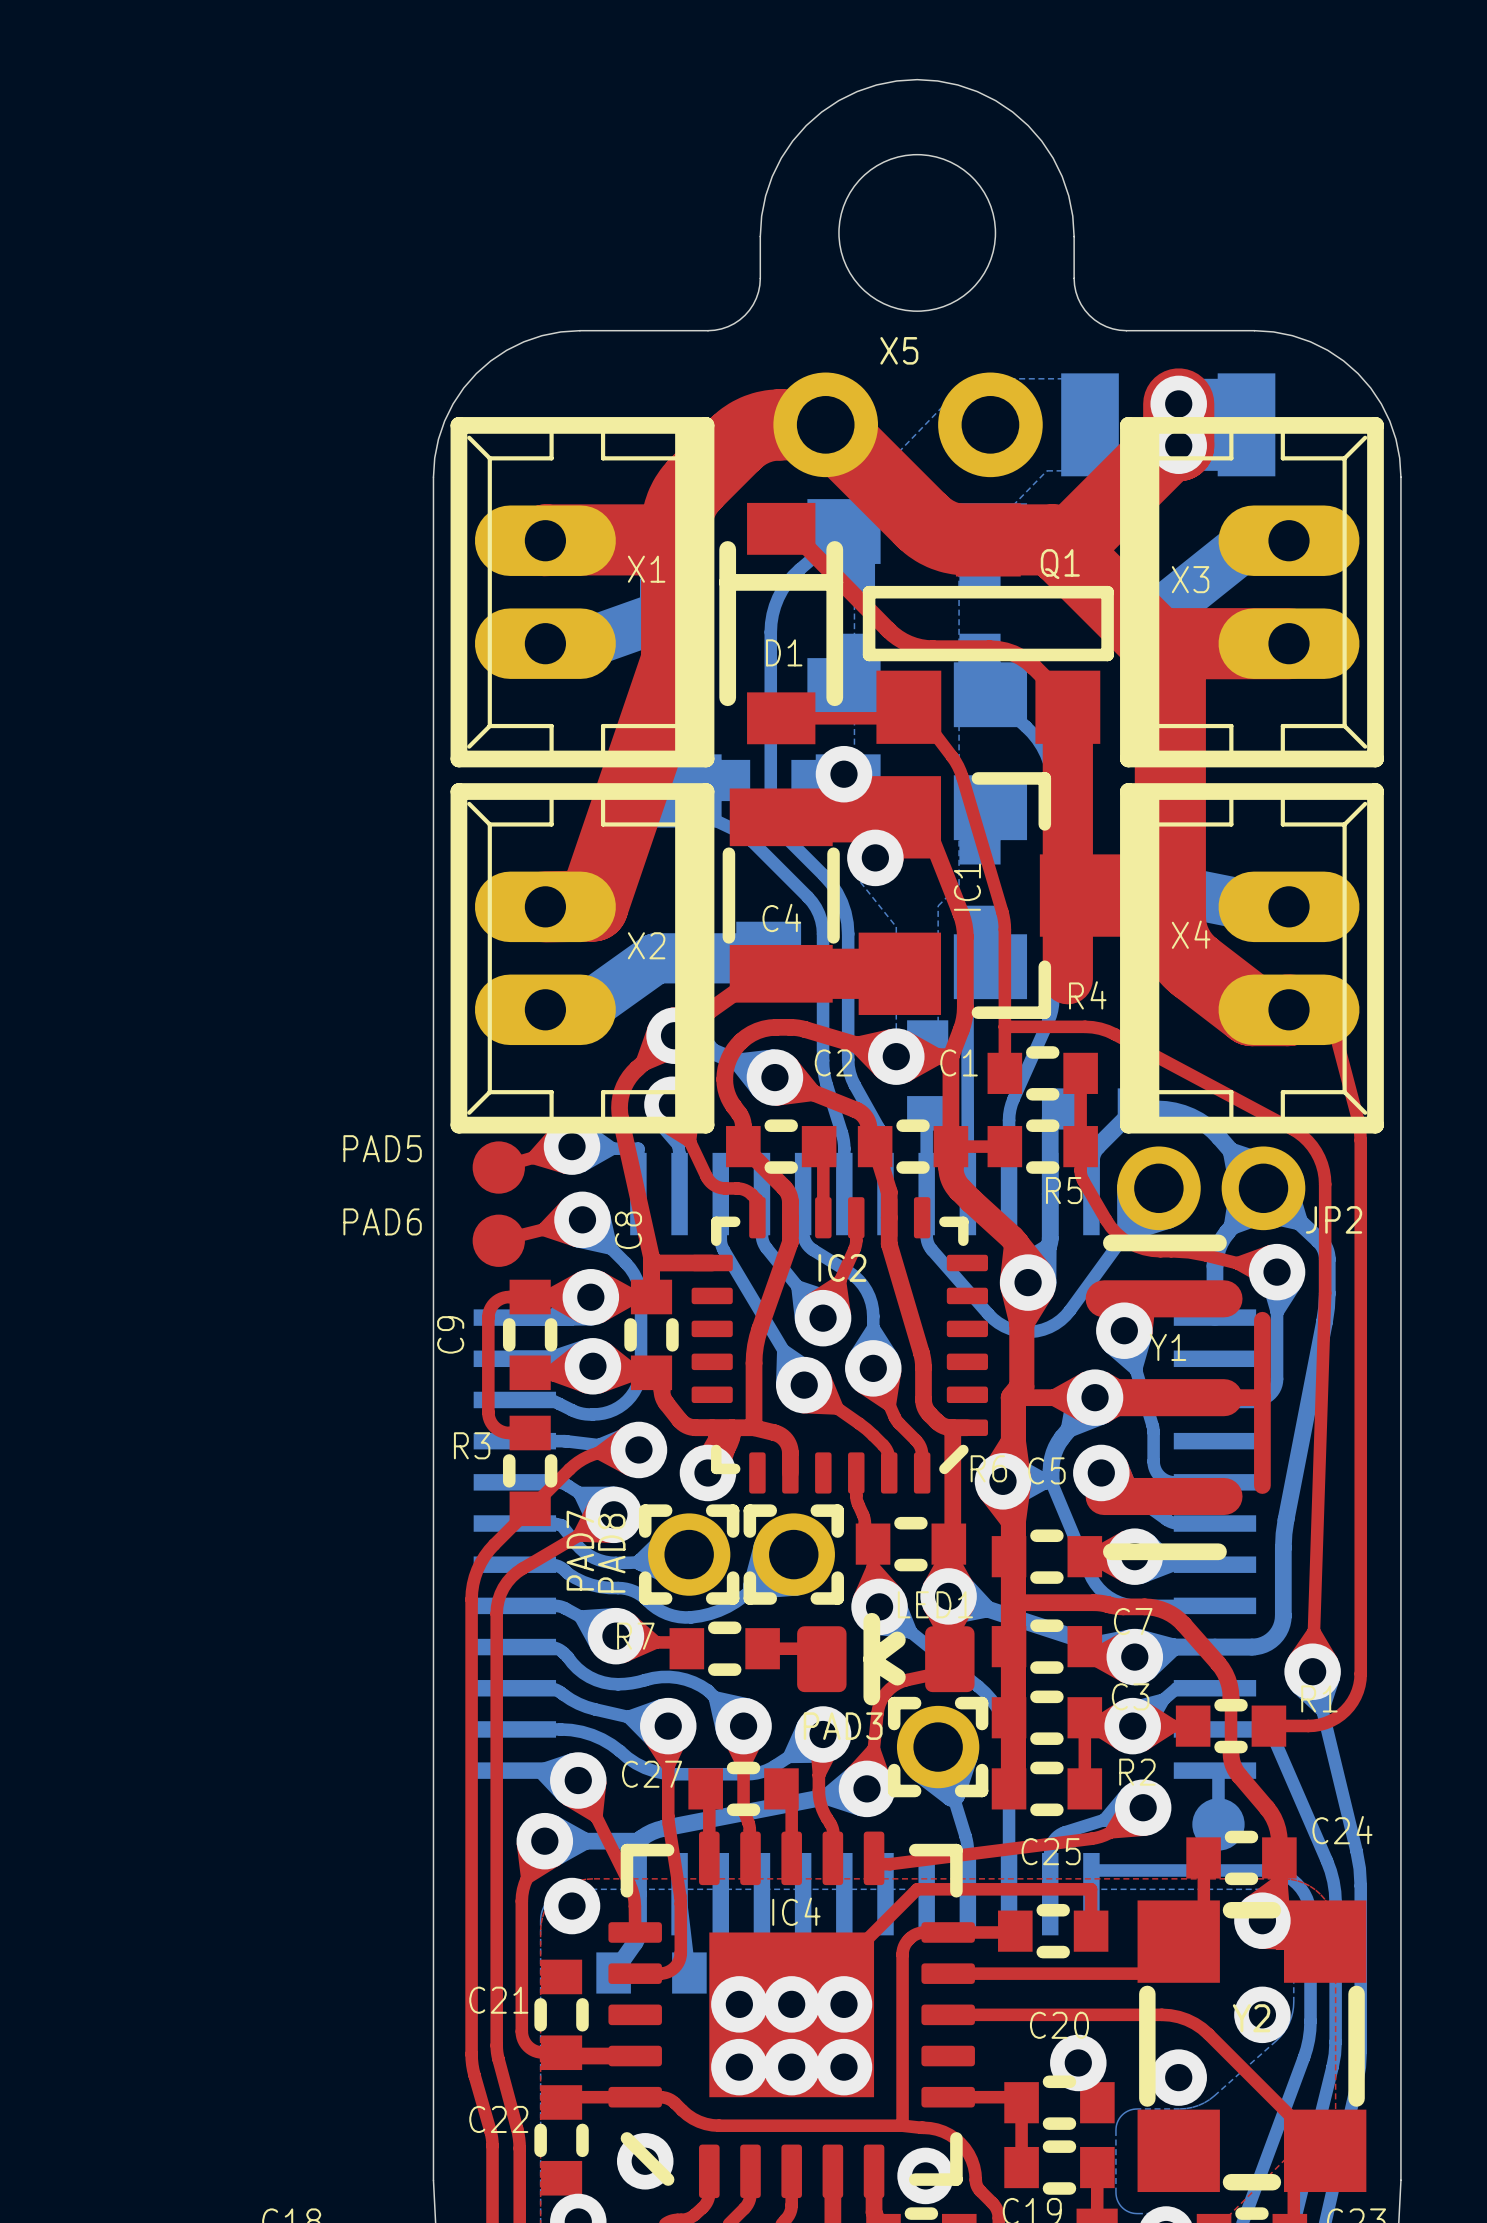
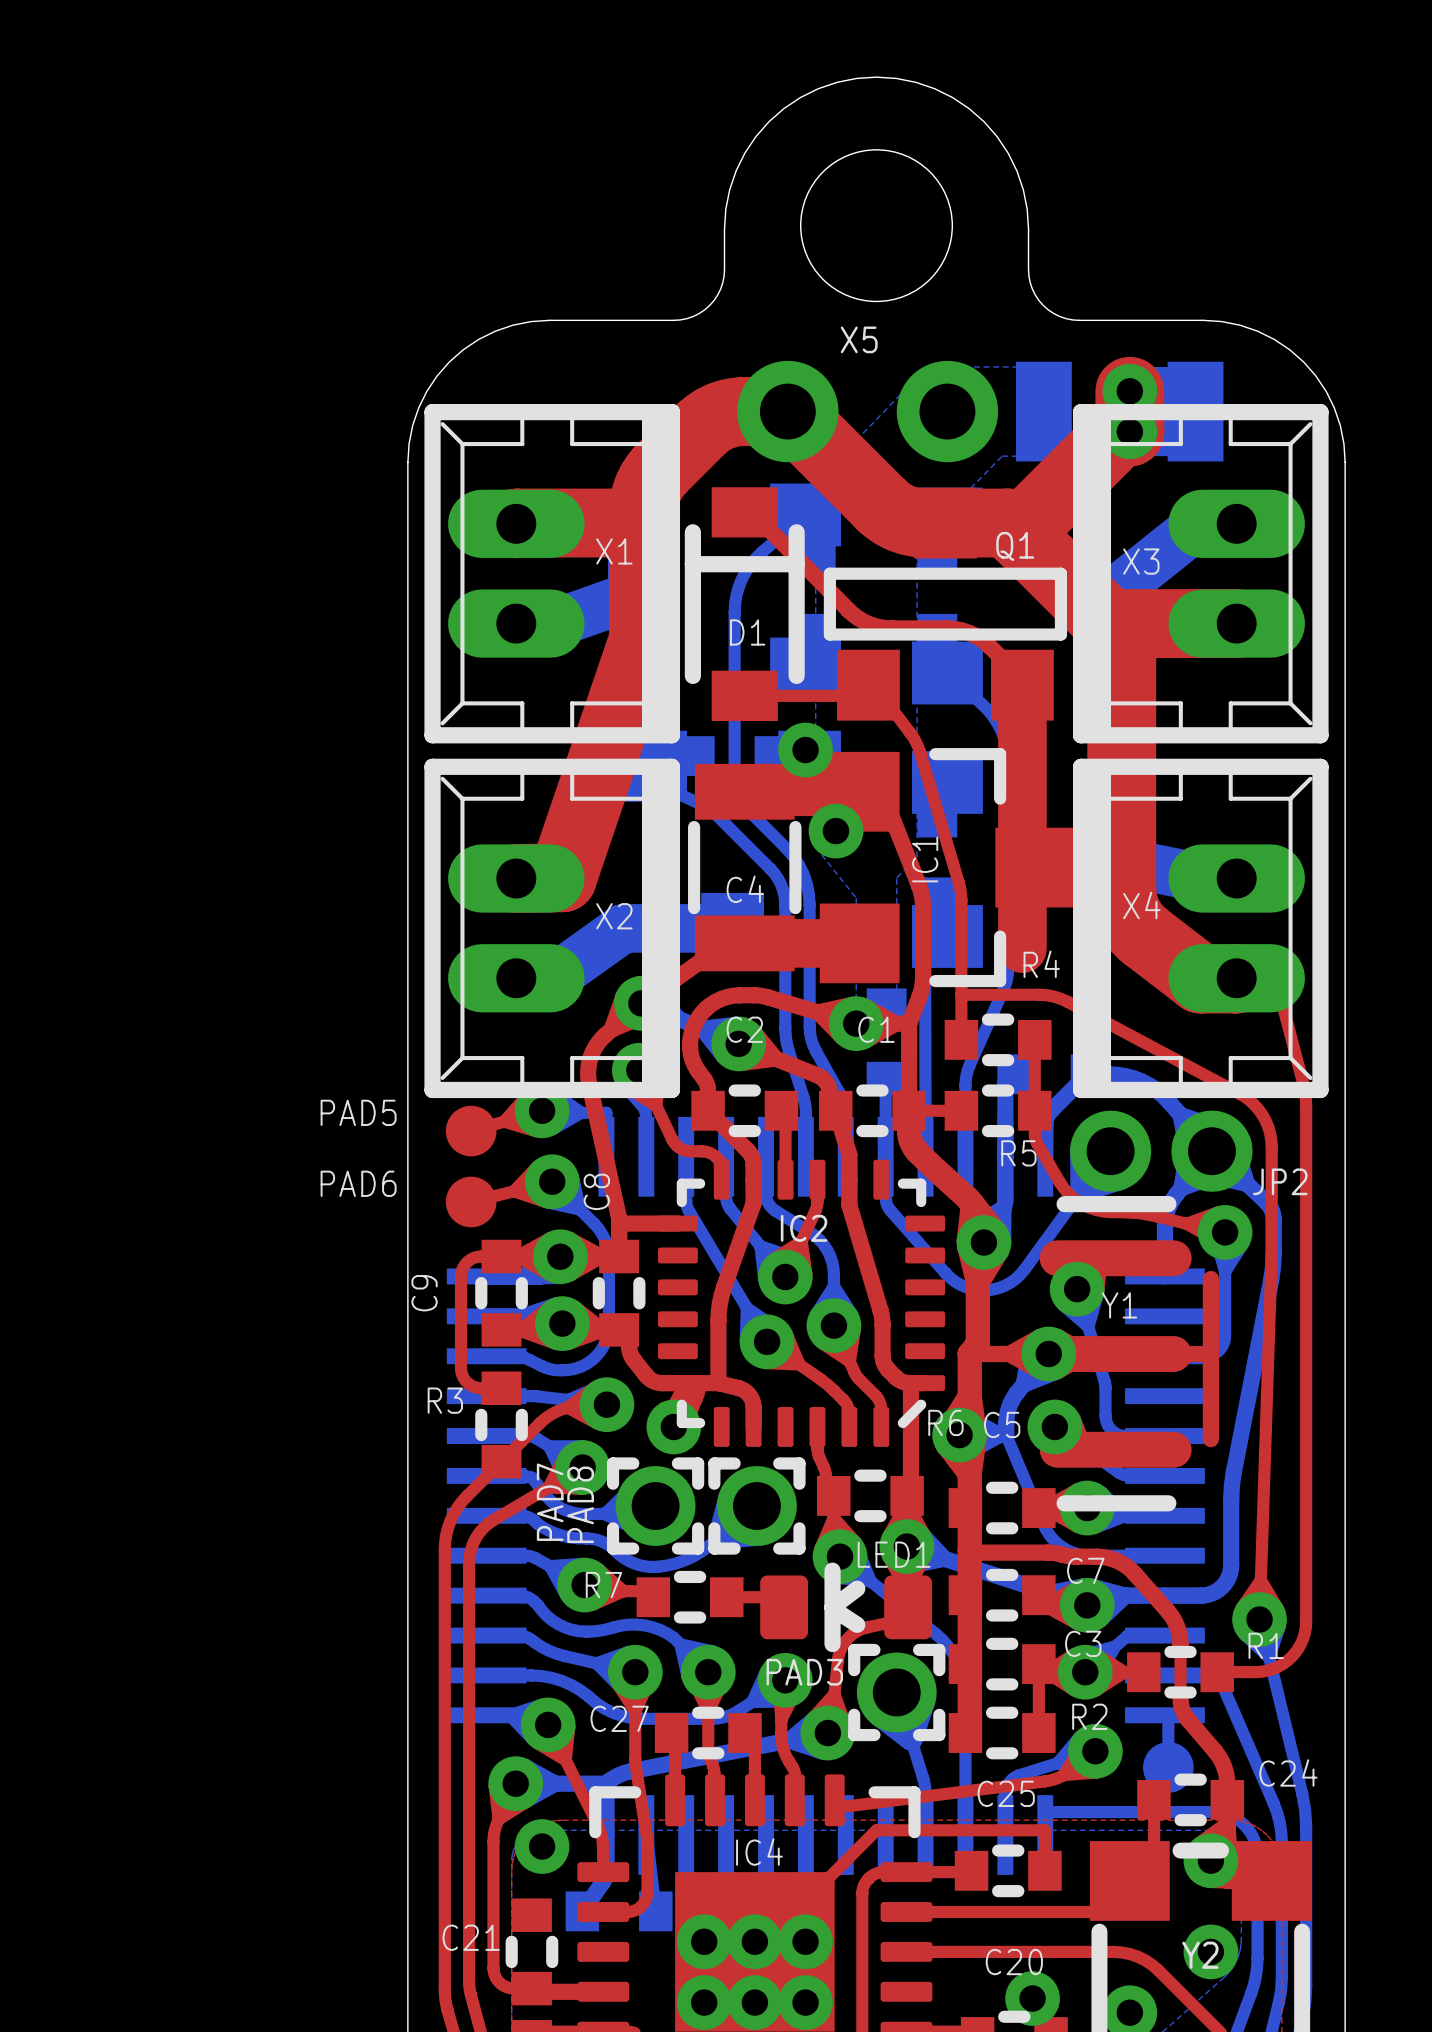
C2 name position: C2 (833, 1062) -> C2 (744, 1029)
C1 name position: C1 (959, 1062) -> C1 (876, 1029)

